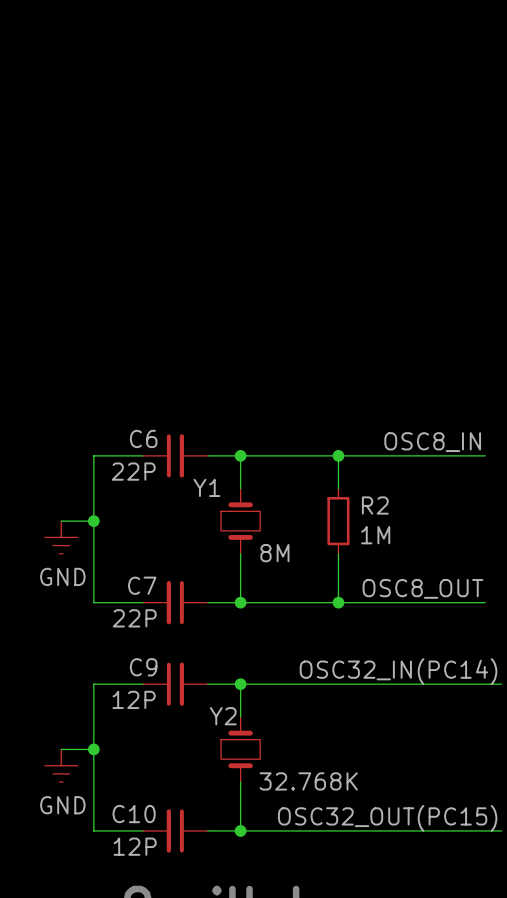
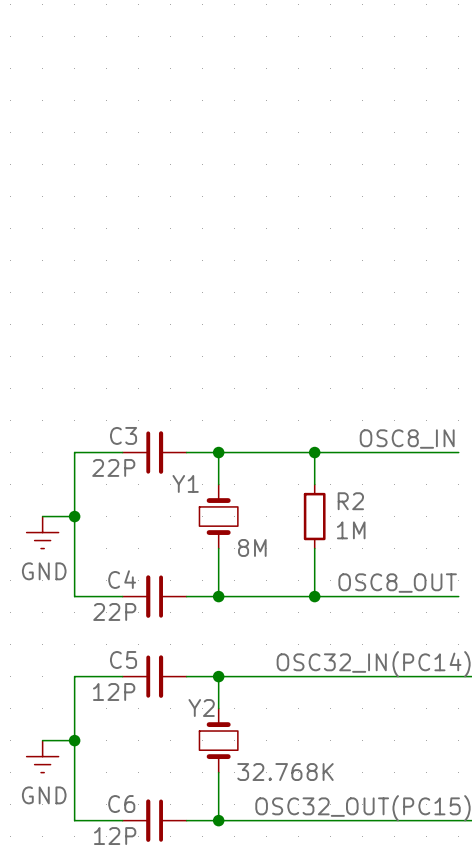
C6 name: C6 (143, 438) -> C3 (123, 435)
C7 name: C7 (142, 585) -> C4 (122, 579)
C9 name: C9 (143, 667) -> C5 (123, 659)
C10 name: C10 (134, 814) -> C6 (121, 804)

